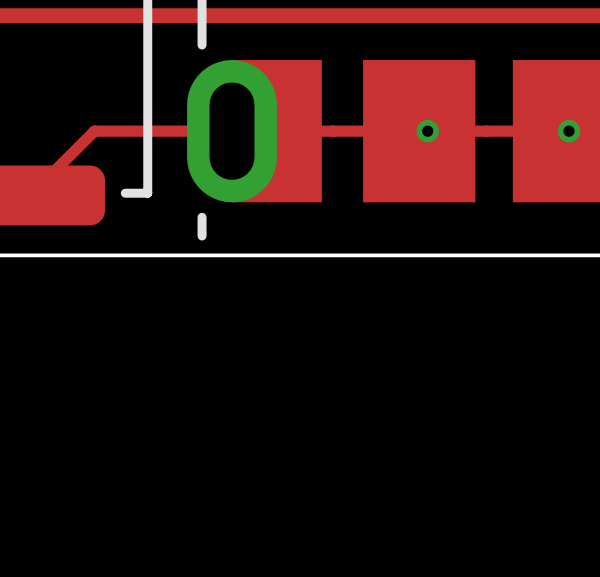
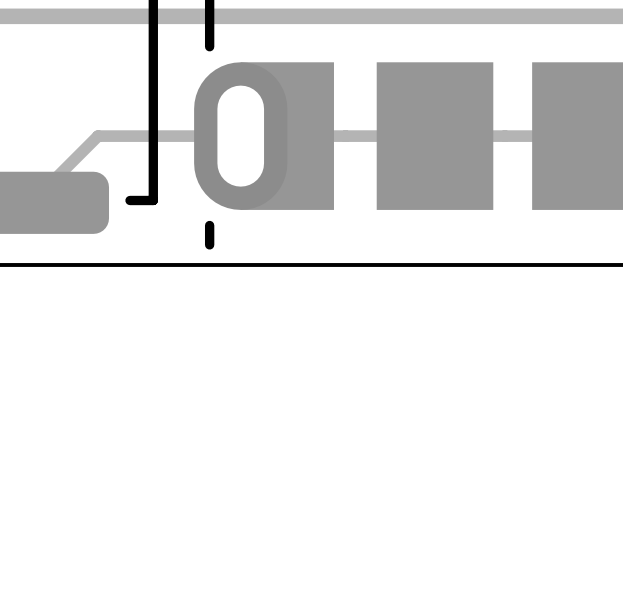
via: (427, 131) -> none
via: (569, 131) -> none

